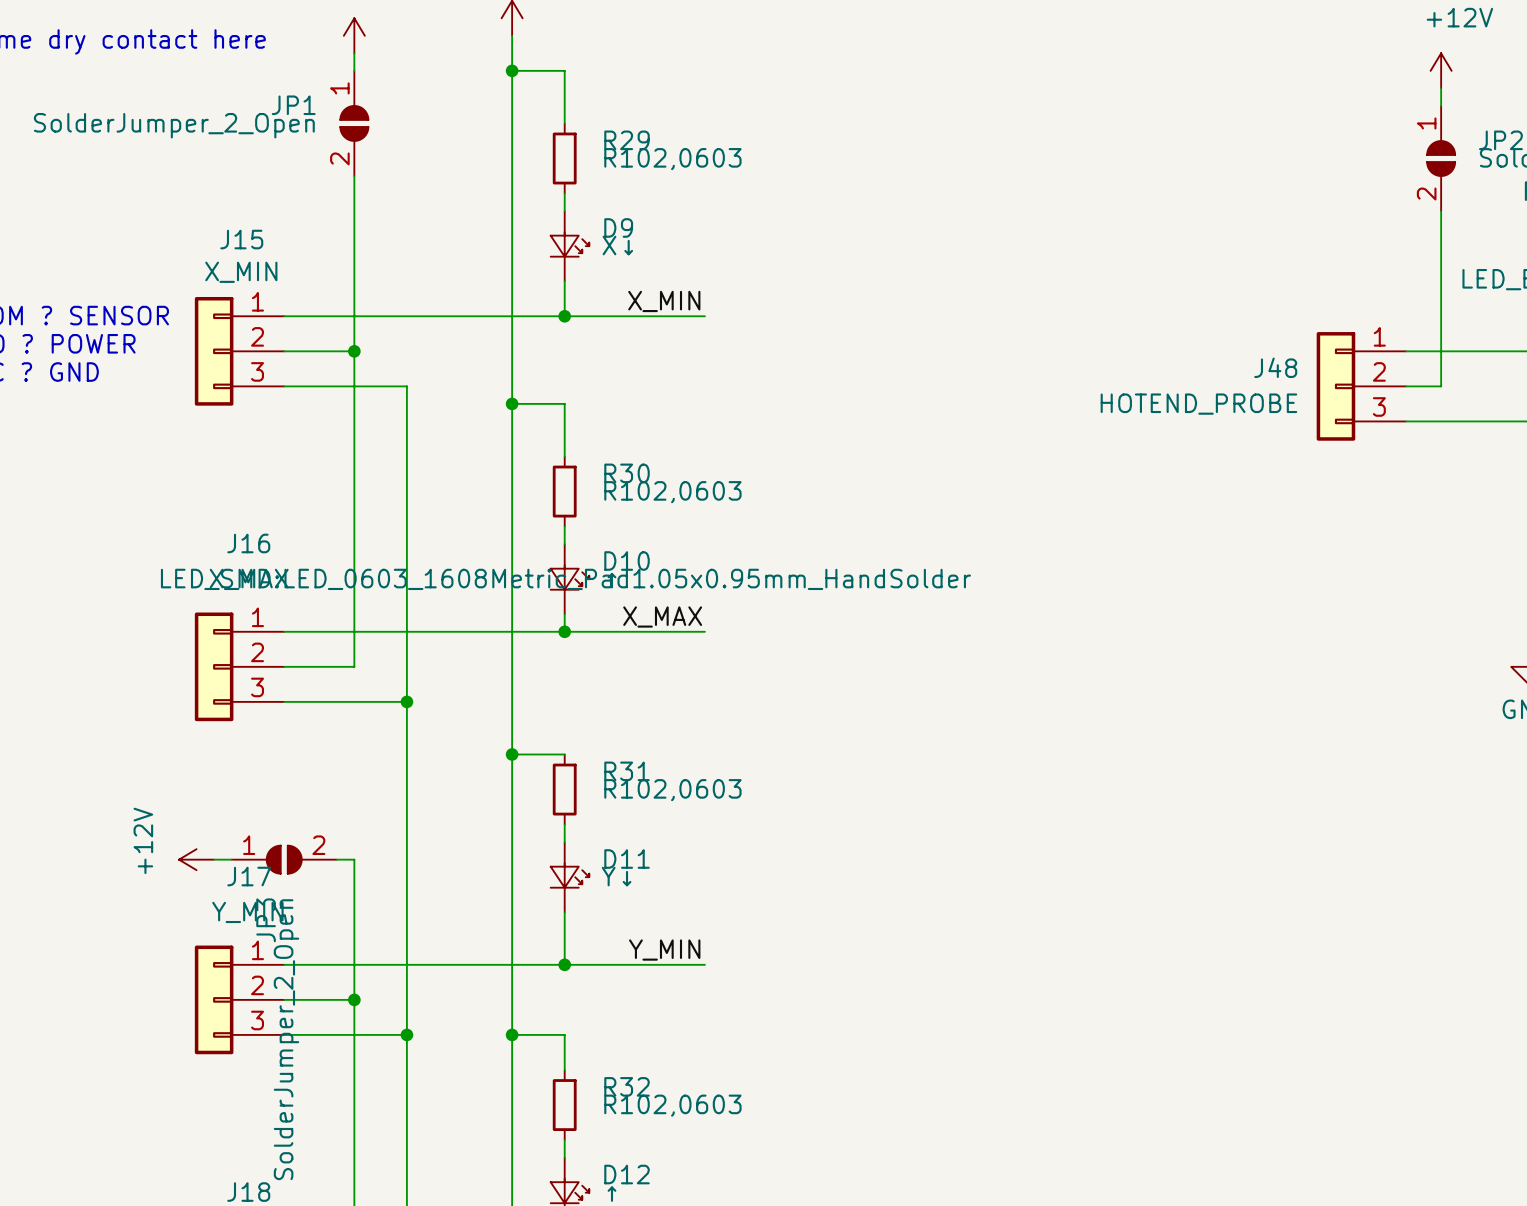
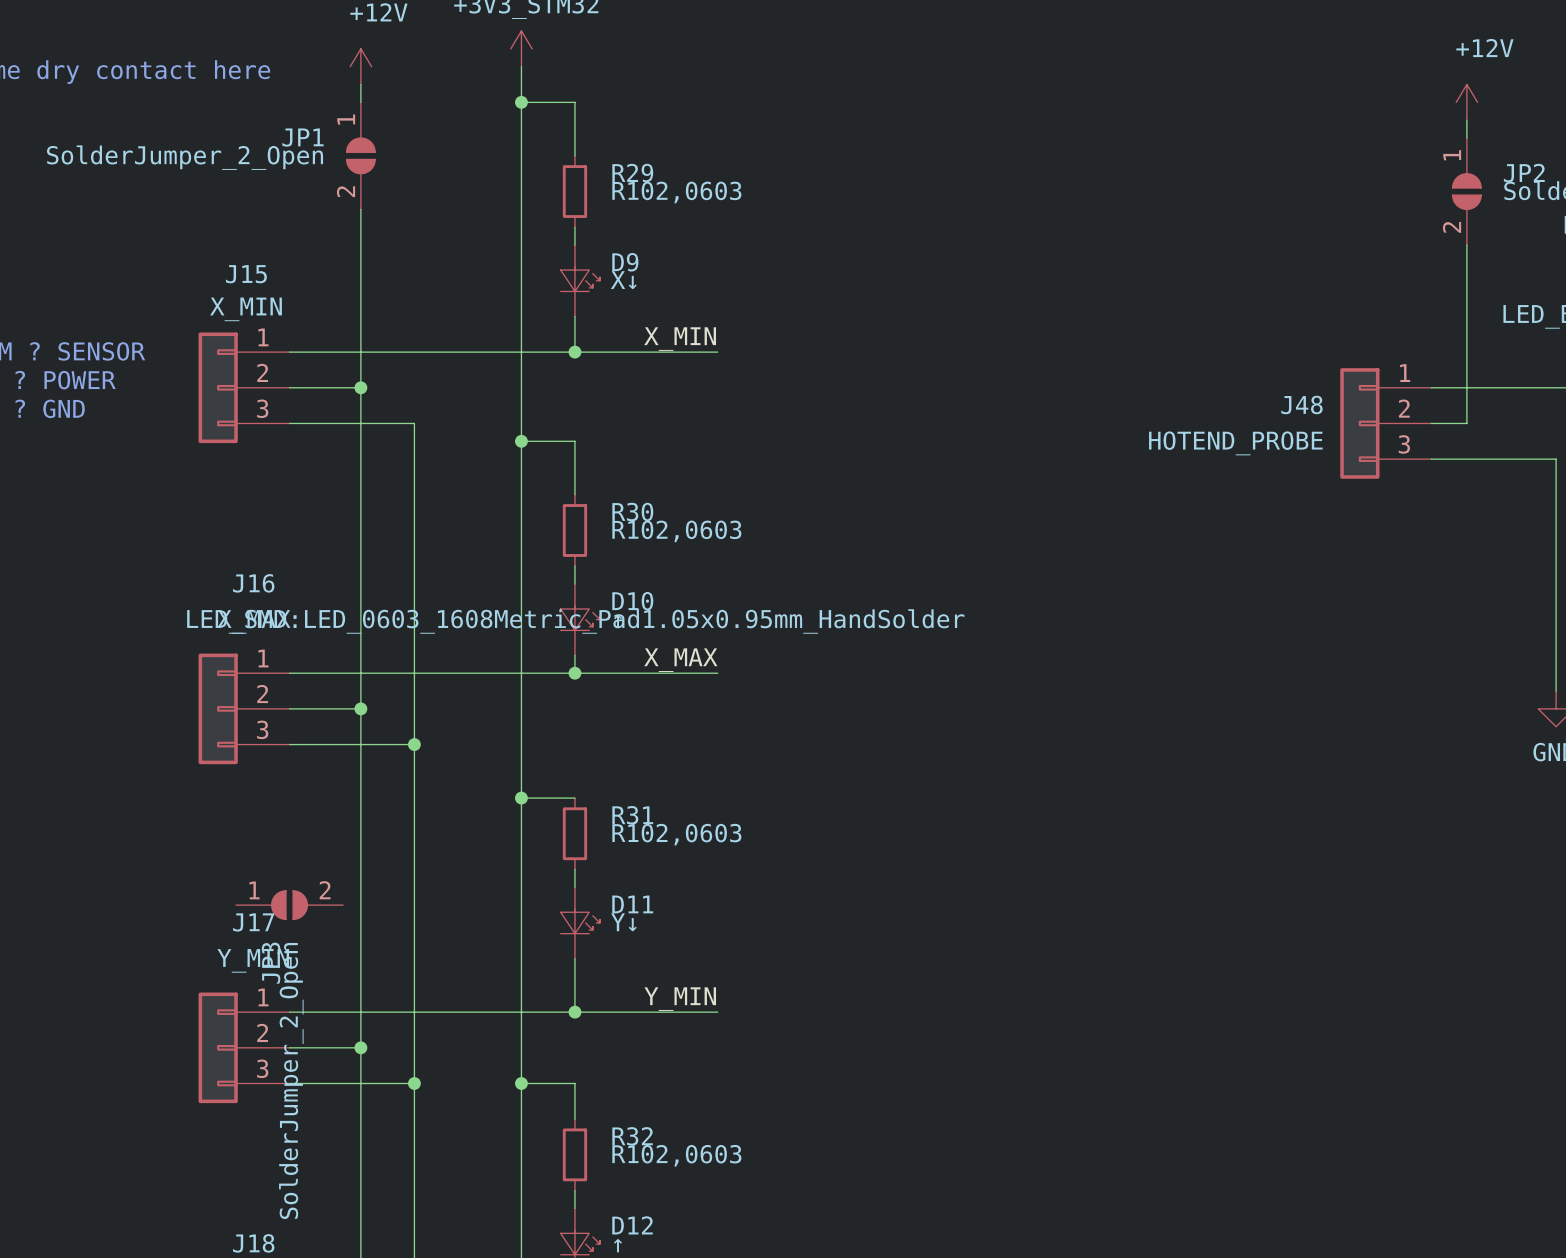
junction: none -> (360, 708)
power symbol: +12V (196, 859) -> none
wire: (214, 859) (231, 859) -> none
wire: (336, 859) (354, 859) -> (360, 708) (360, 905)

